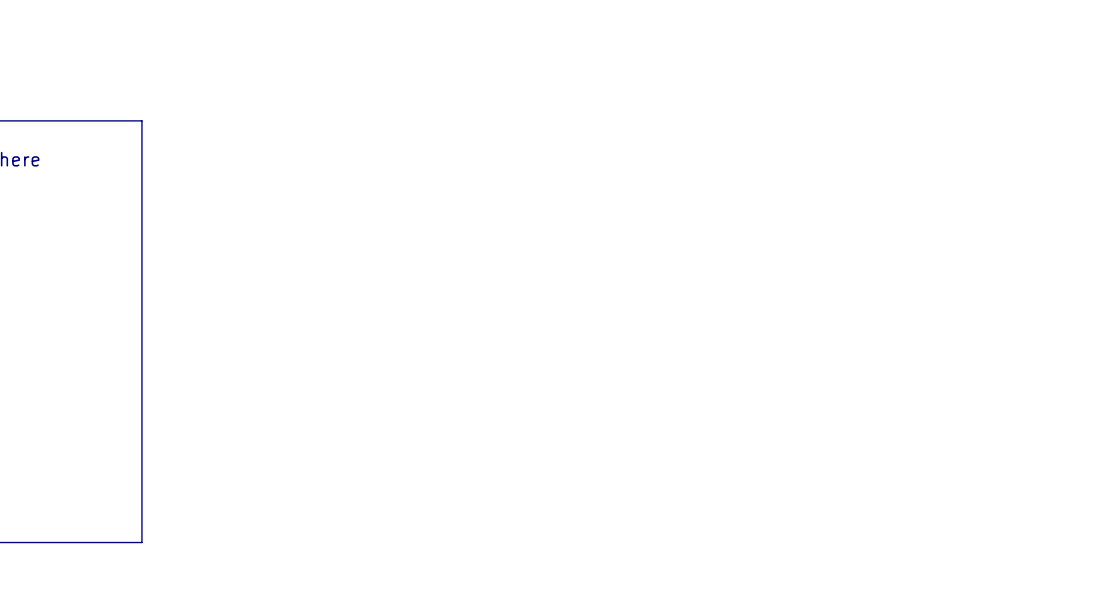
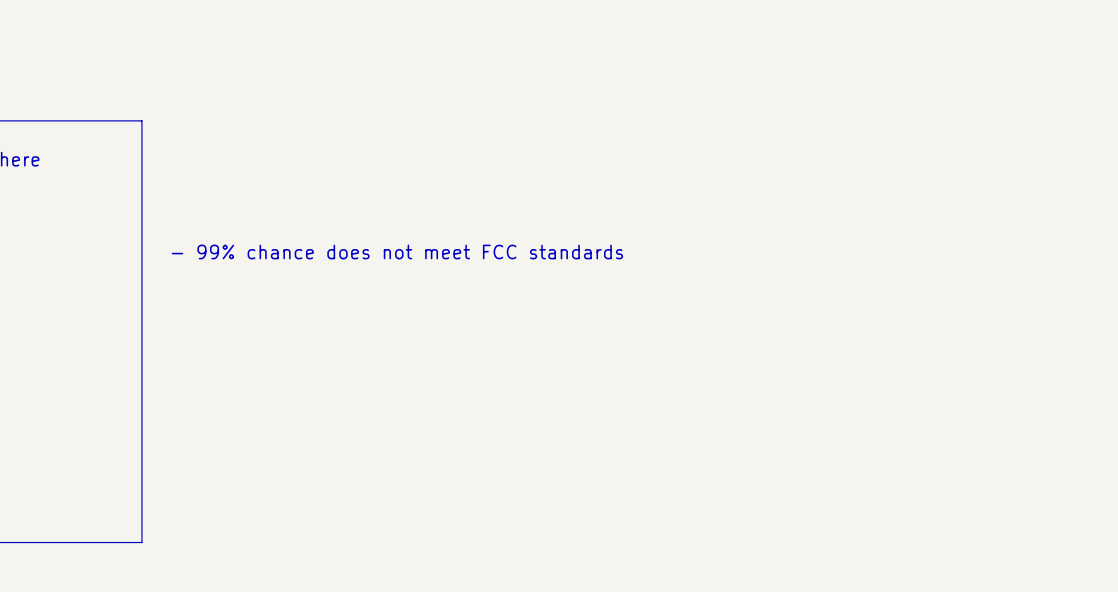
text: none -> - 99% chance does not meet FCC standards (397, 252)

